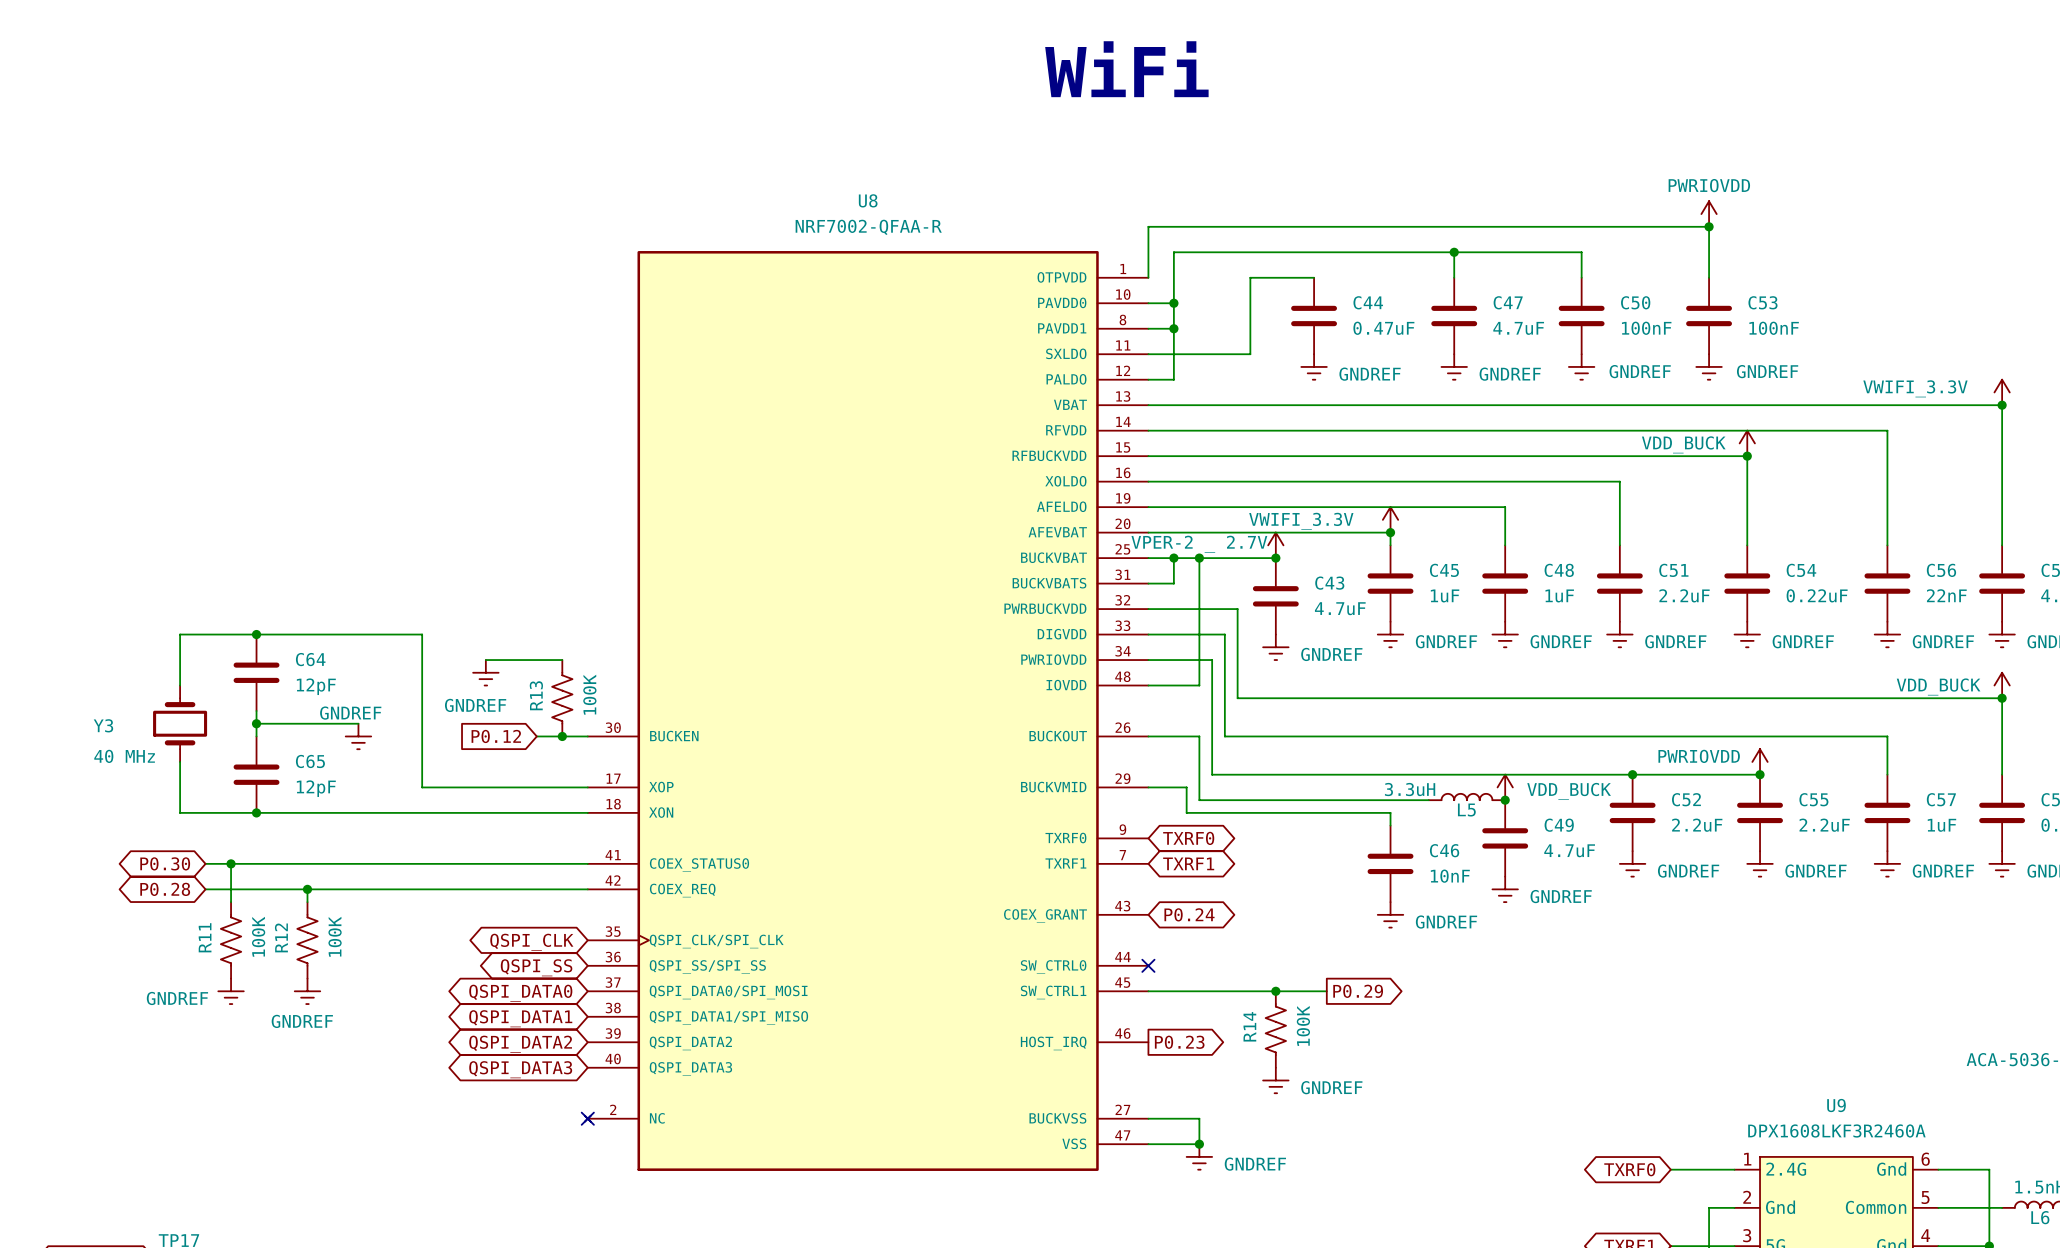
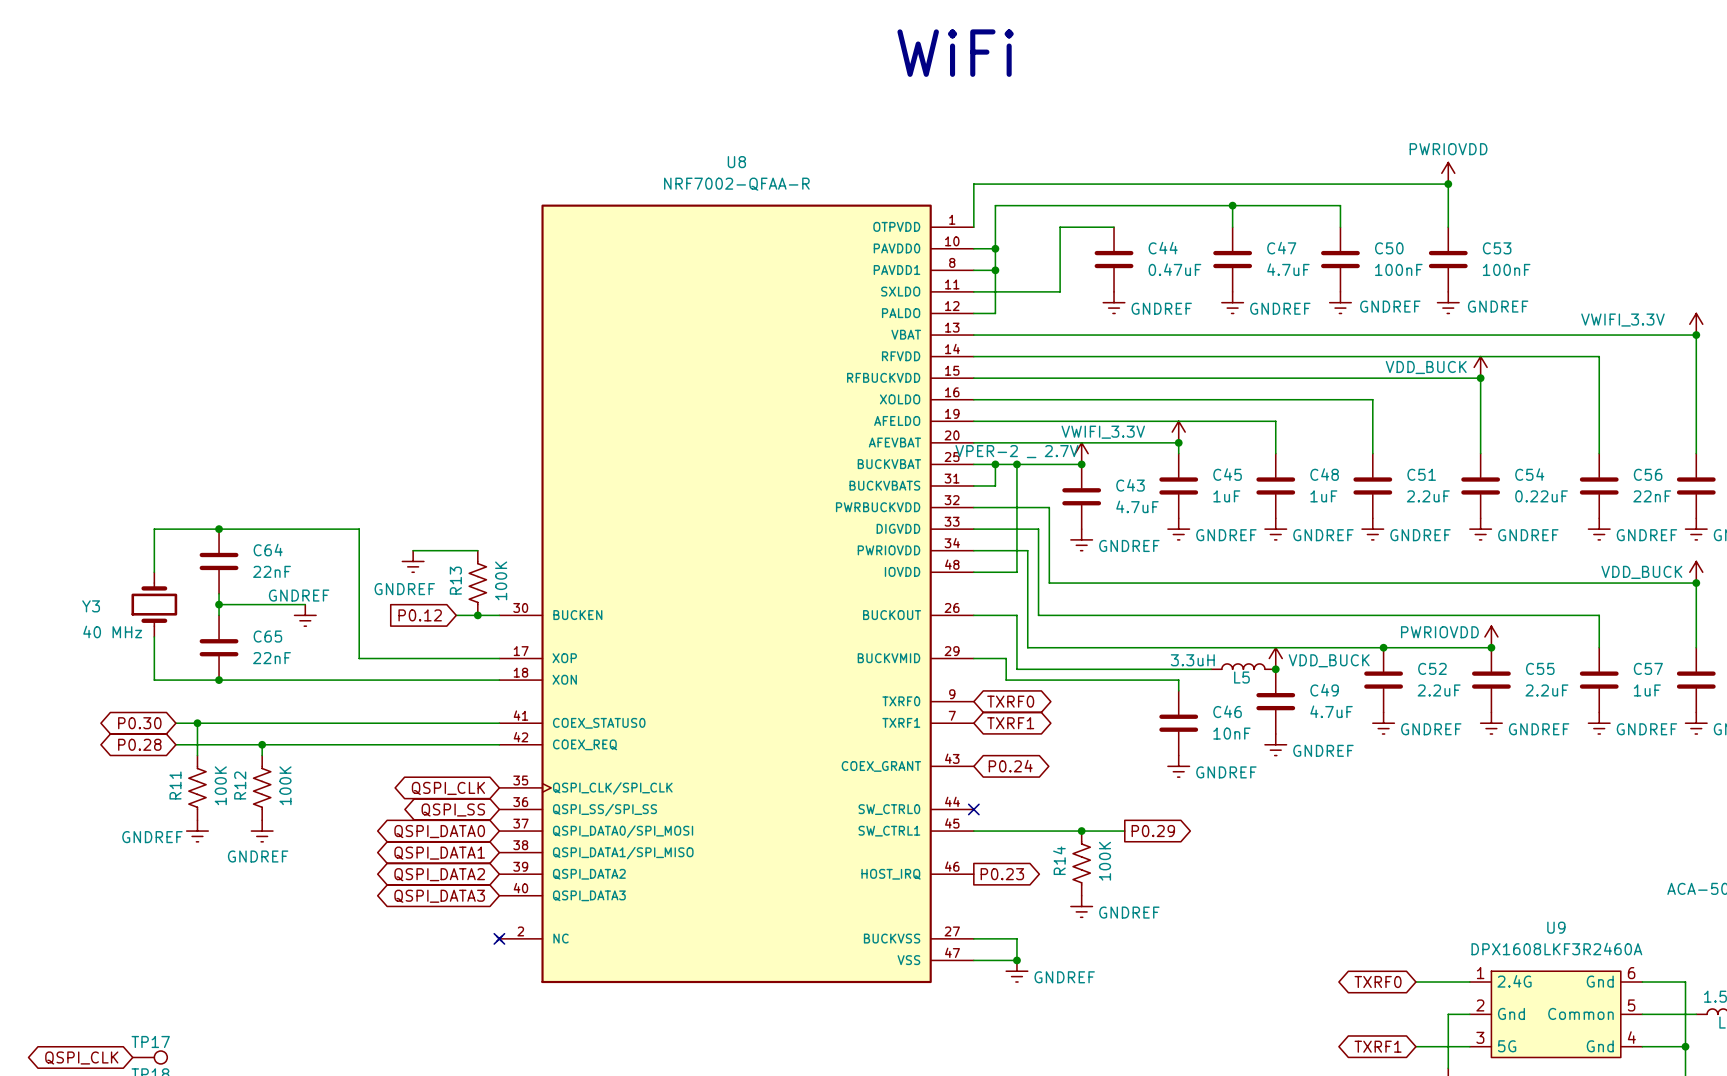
C64 value: 12pF (316, 686) -> 22nF (272, 571)
C65 value: 12pF (316, 788) -> 22nF (272, 658)

